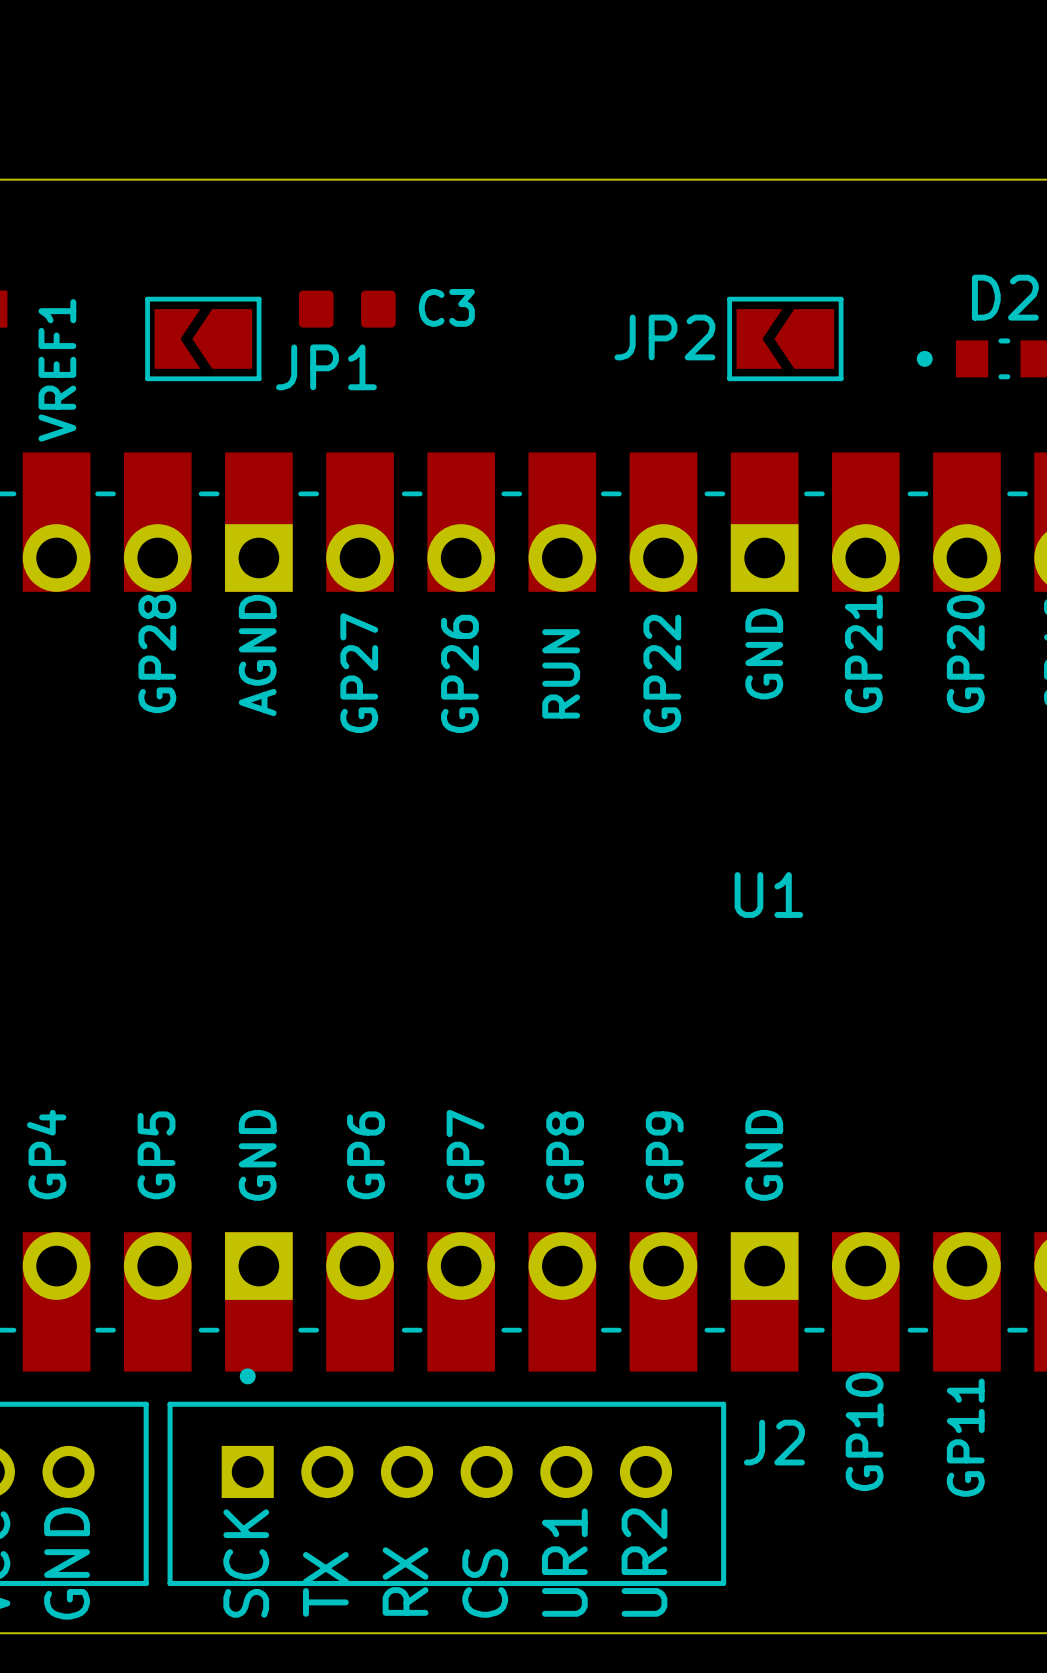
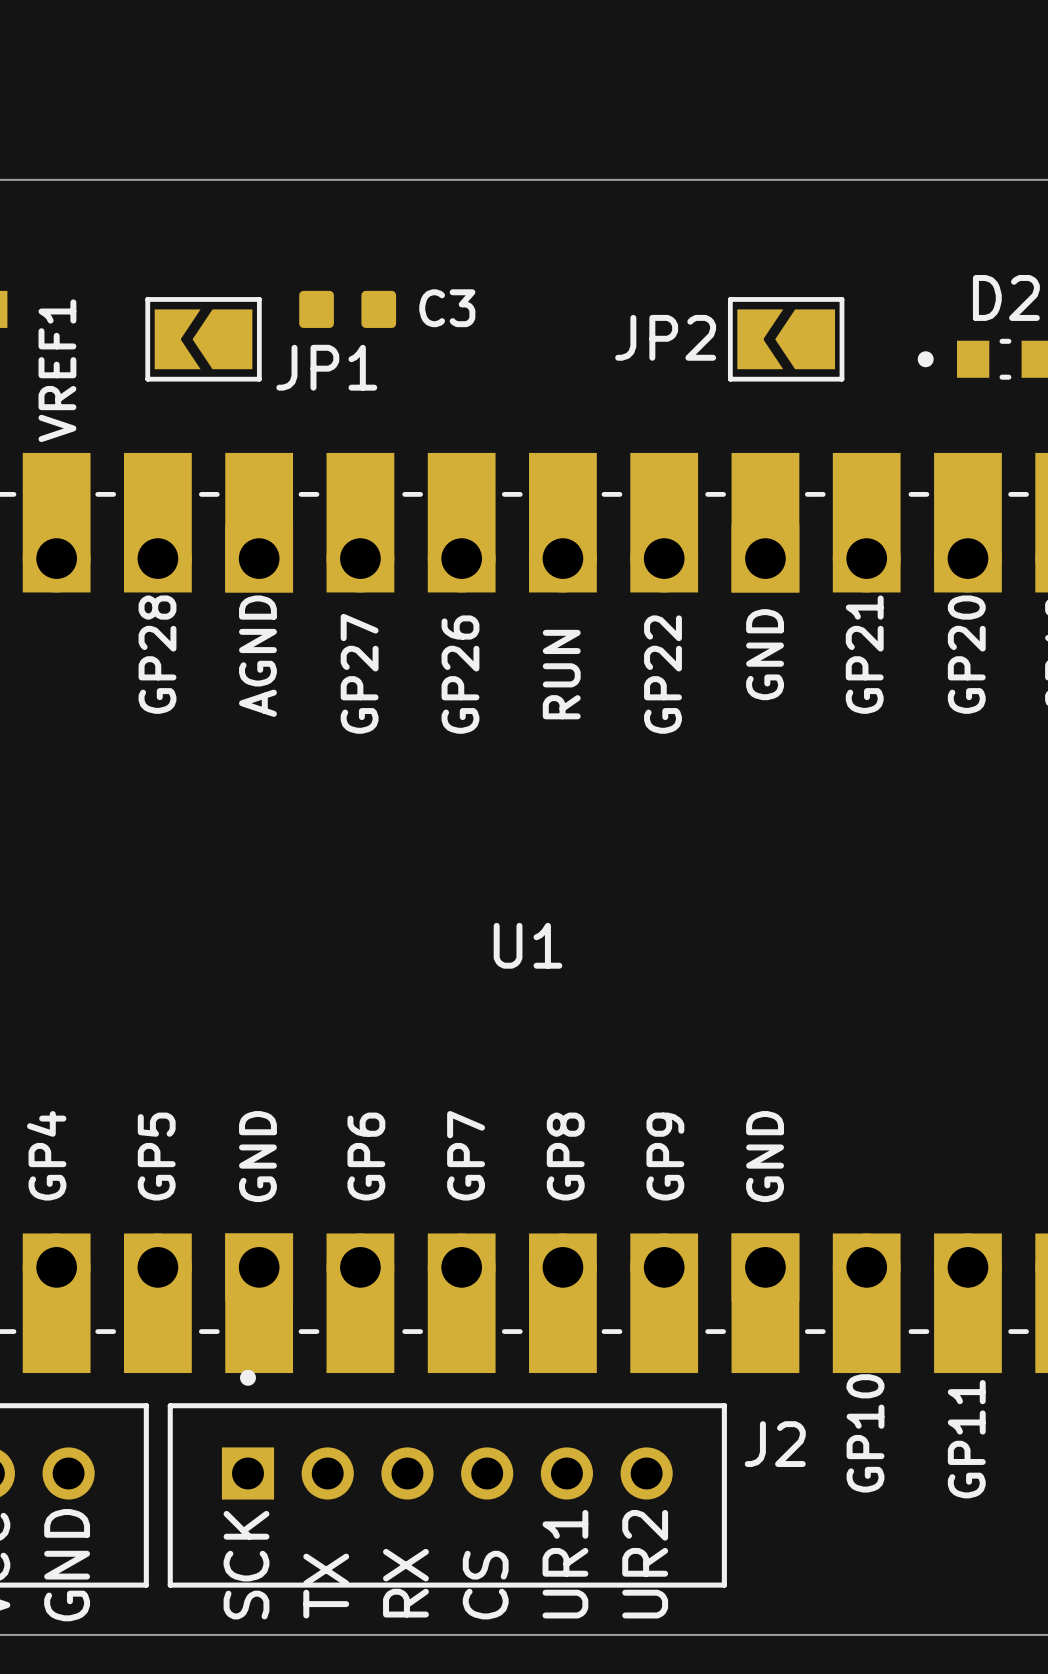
U1 name position: U1 (768, 895) -> U1 (528, 945)

